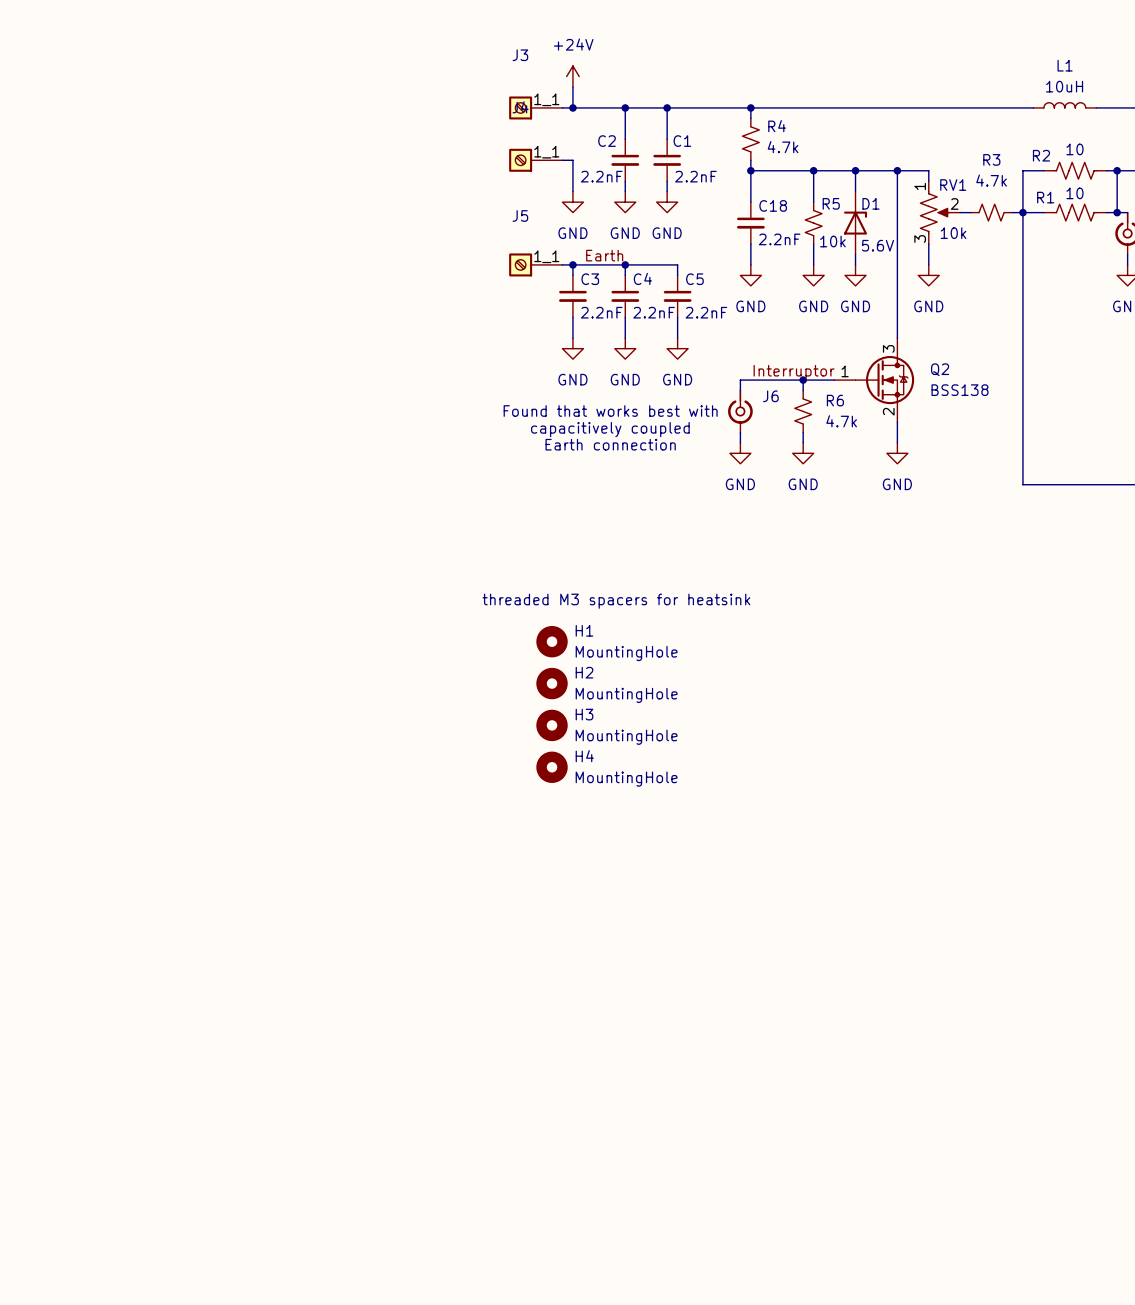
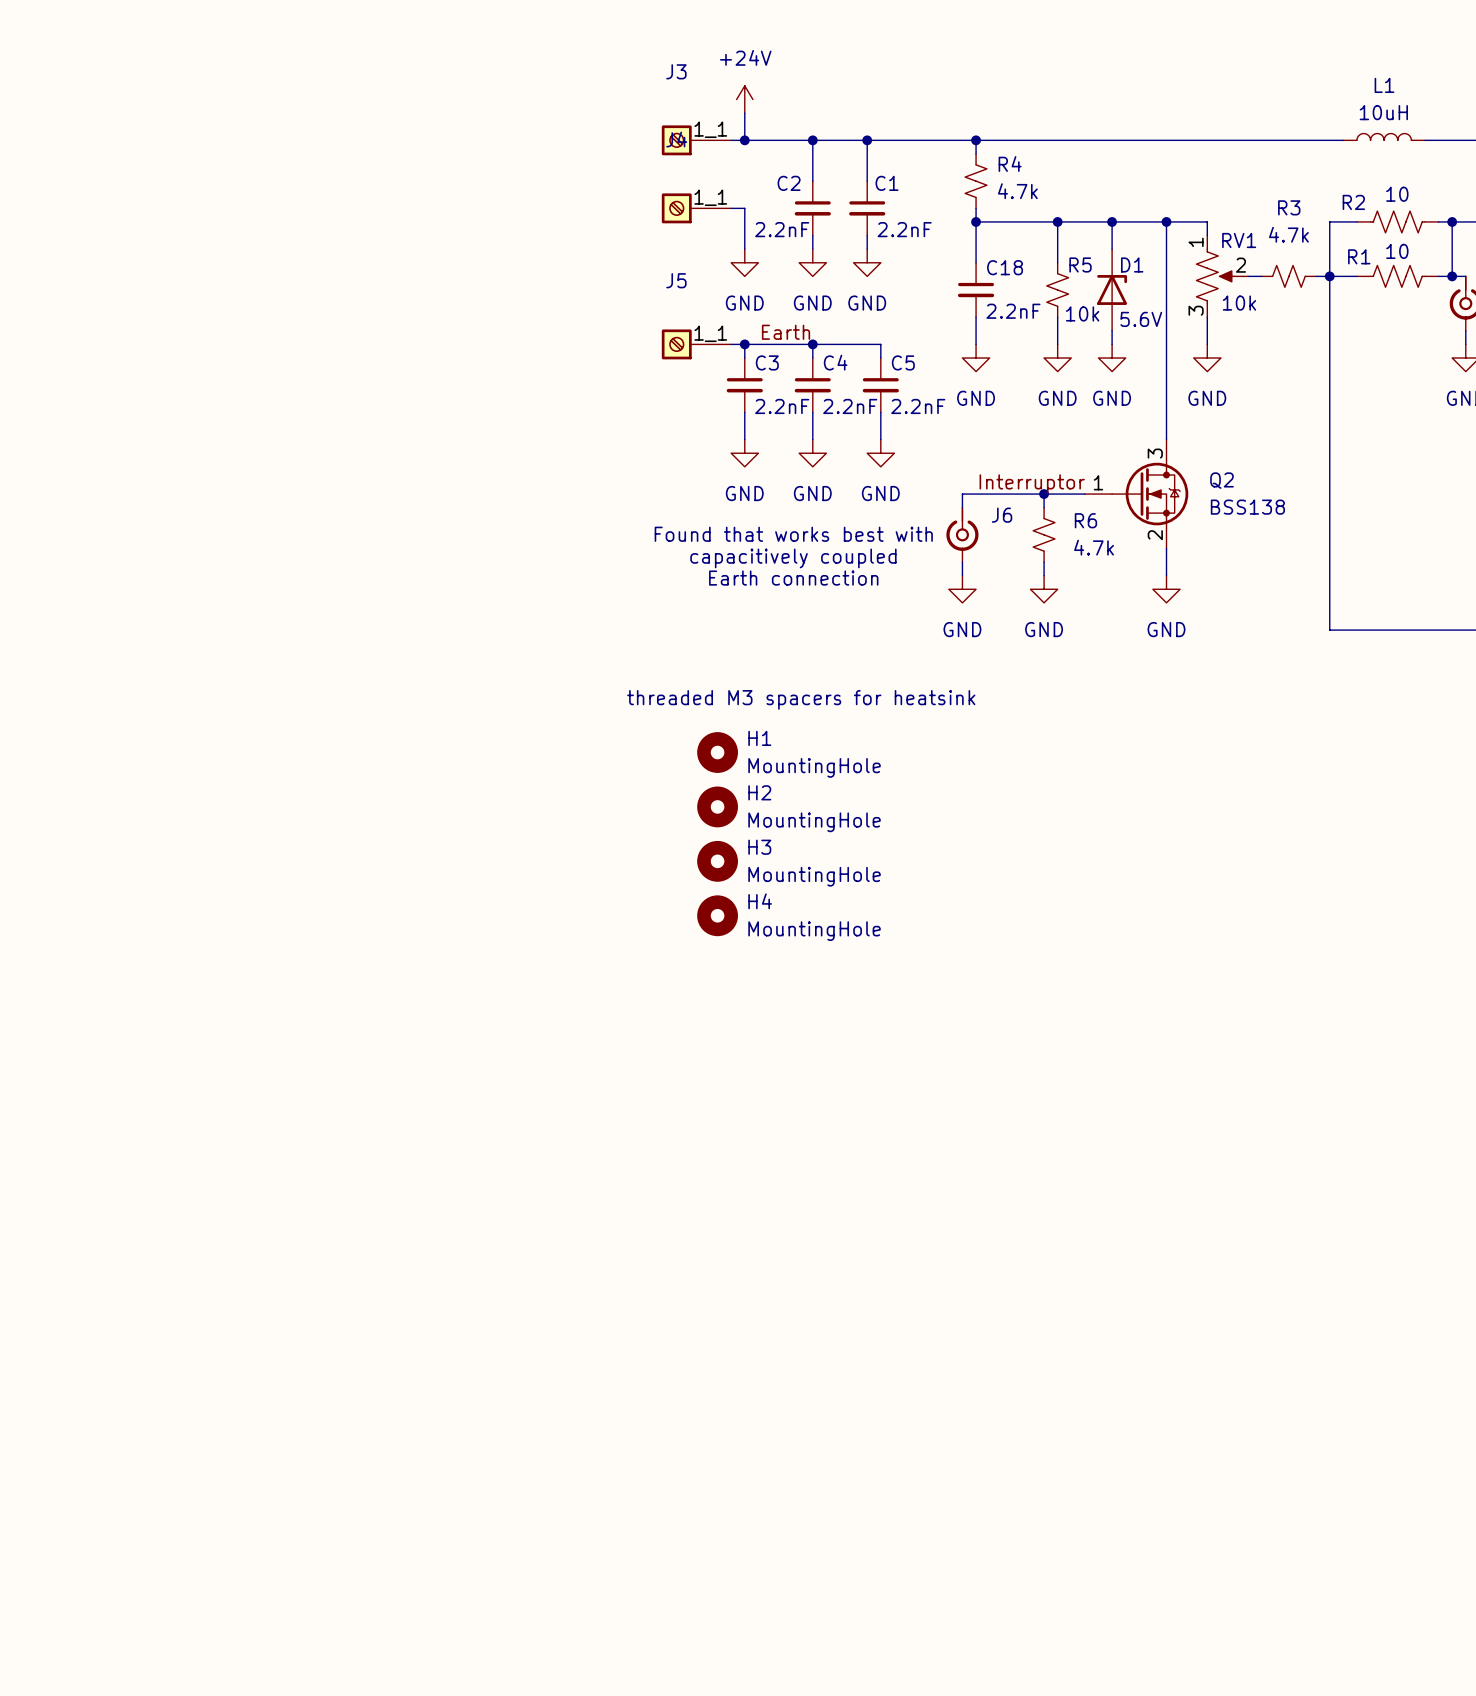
text position: threaded M3 spacers for heatsink (616, 601) -> threaded M3 spacers for heatsink (801, 699)
H1 position: (552, 641) -> (717, 752)
H2 position: (552, 683) -> (717, 806)
H3 position: (552, 725) -> (717, 861)
H4 position: (552, 767) -> (717, 915)

